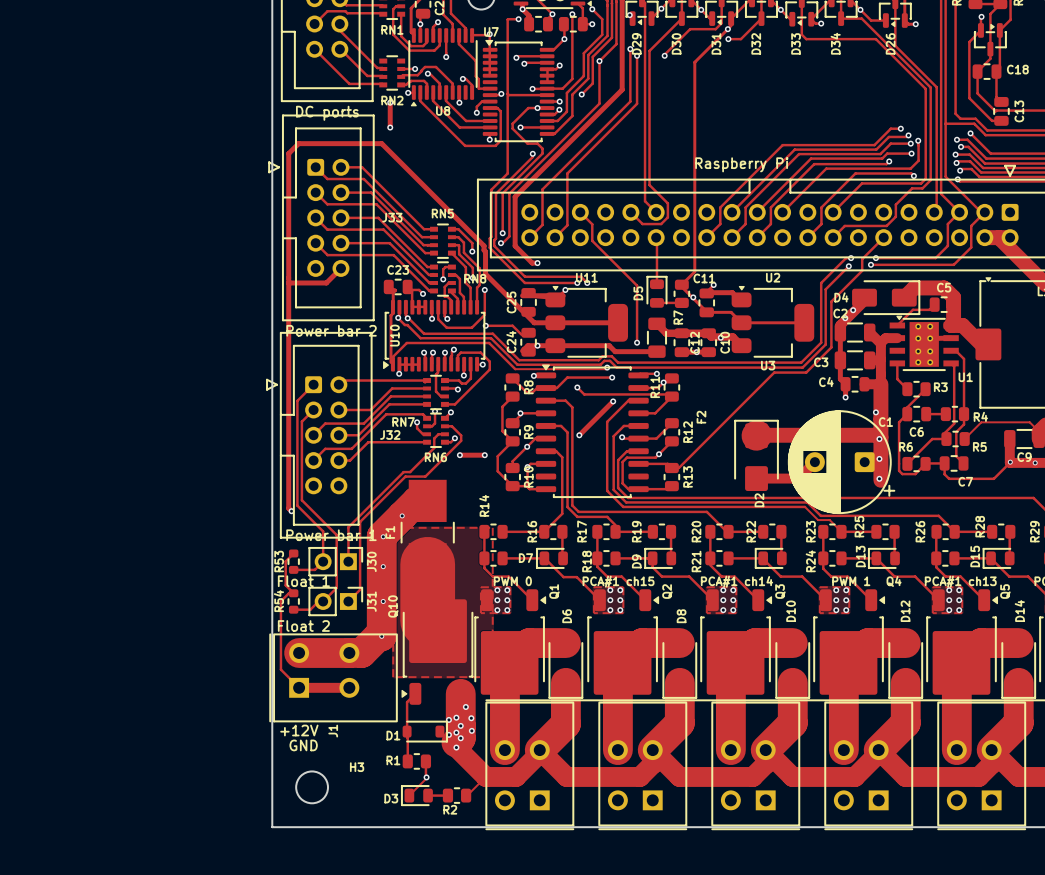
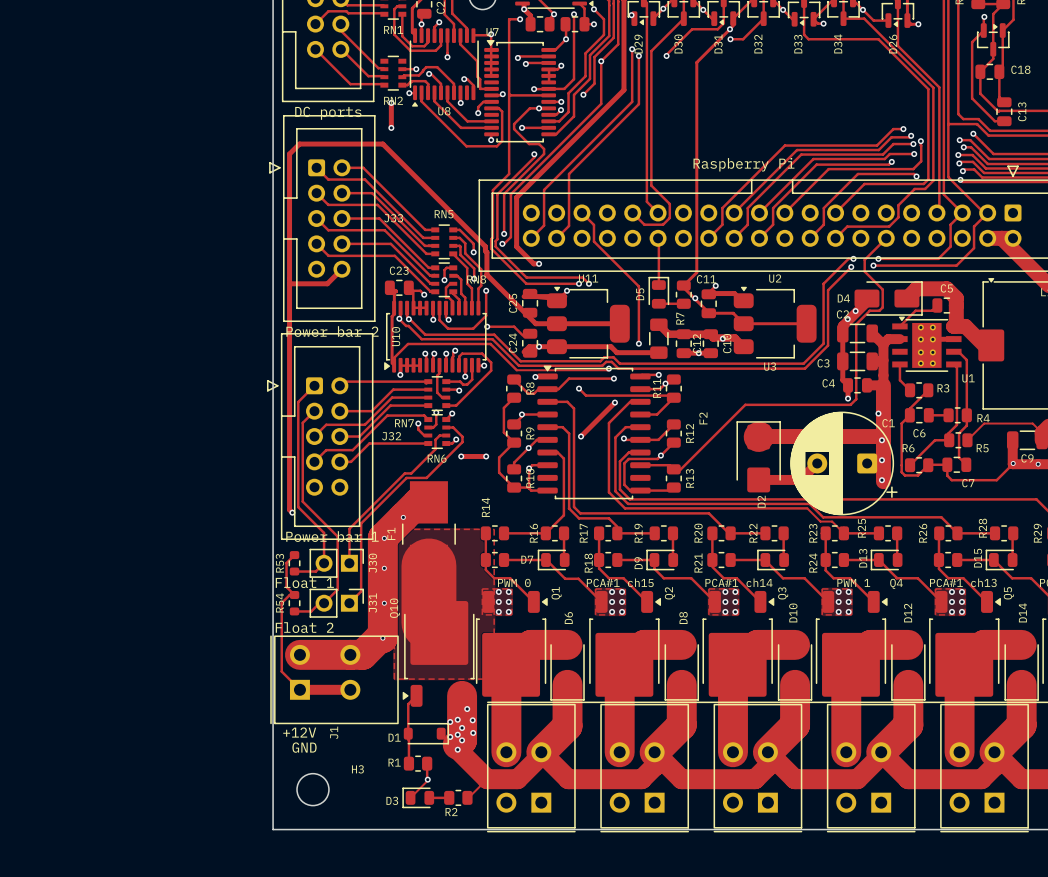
track: (862, 270) (831, 301) (831, 347) (806, 372) (774, 372) (743, 403) -> (864, 271) (882, 289) (882, 307) (879, 310) (869, 310) (856, 324) (856, 399) (850, 404) (745, 404)

